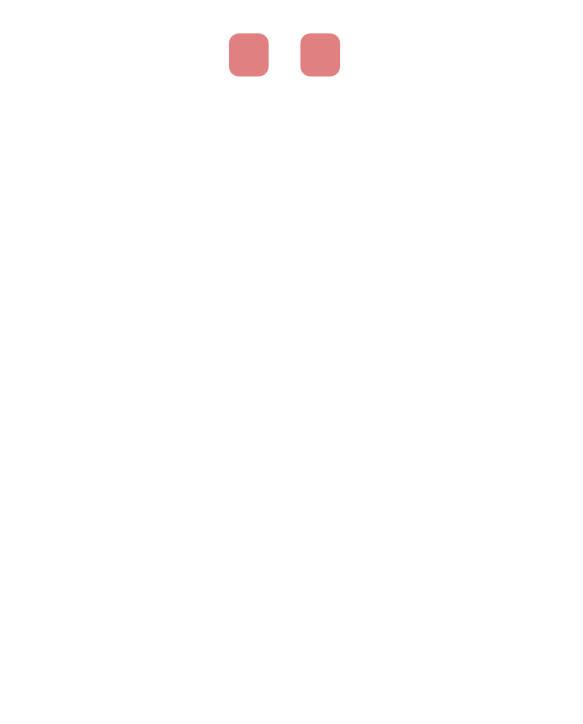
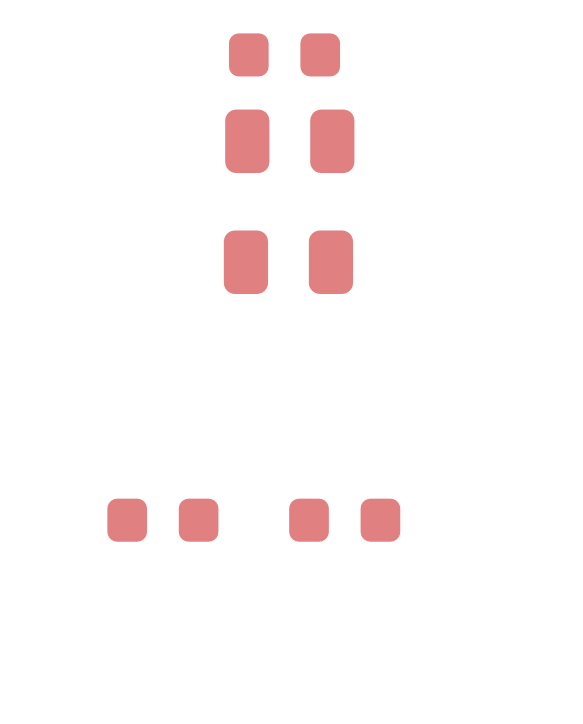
part: none -> (289, 141)
part: none -> (288, 262)
part: none -> (162, 520)
part: none -> (344, 520)

